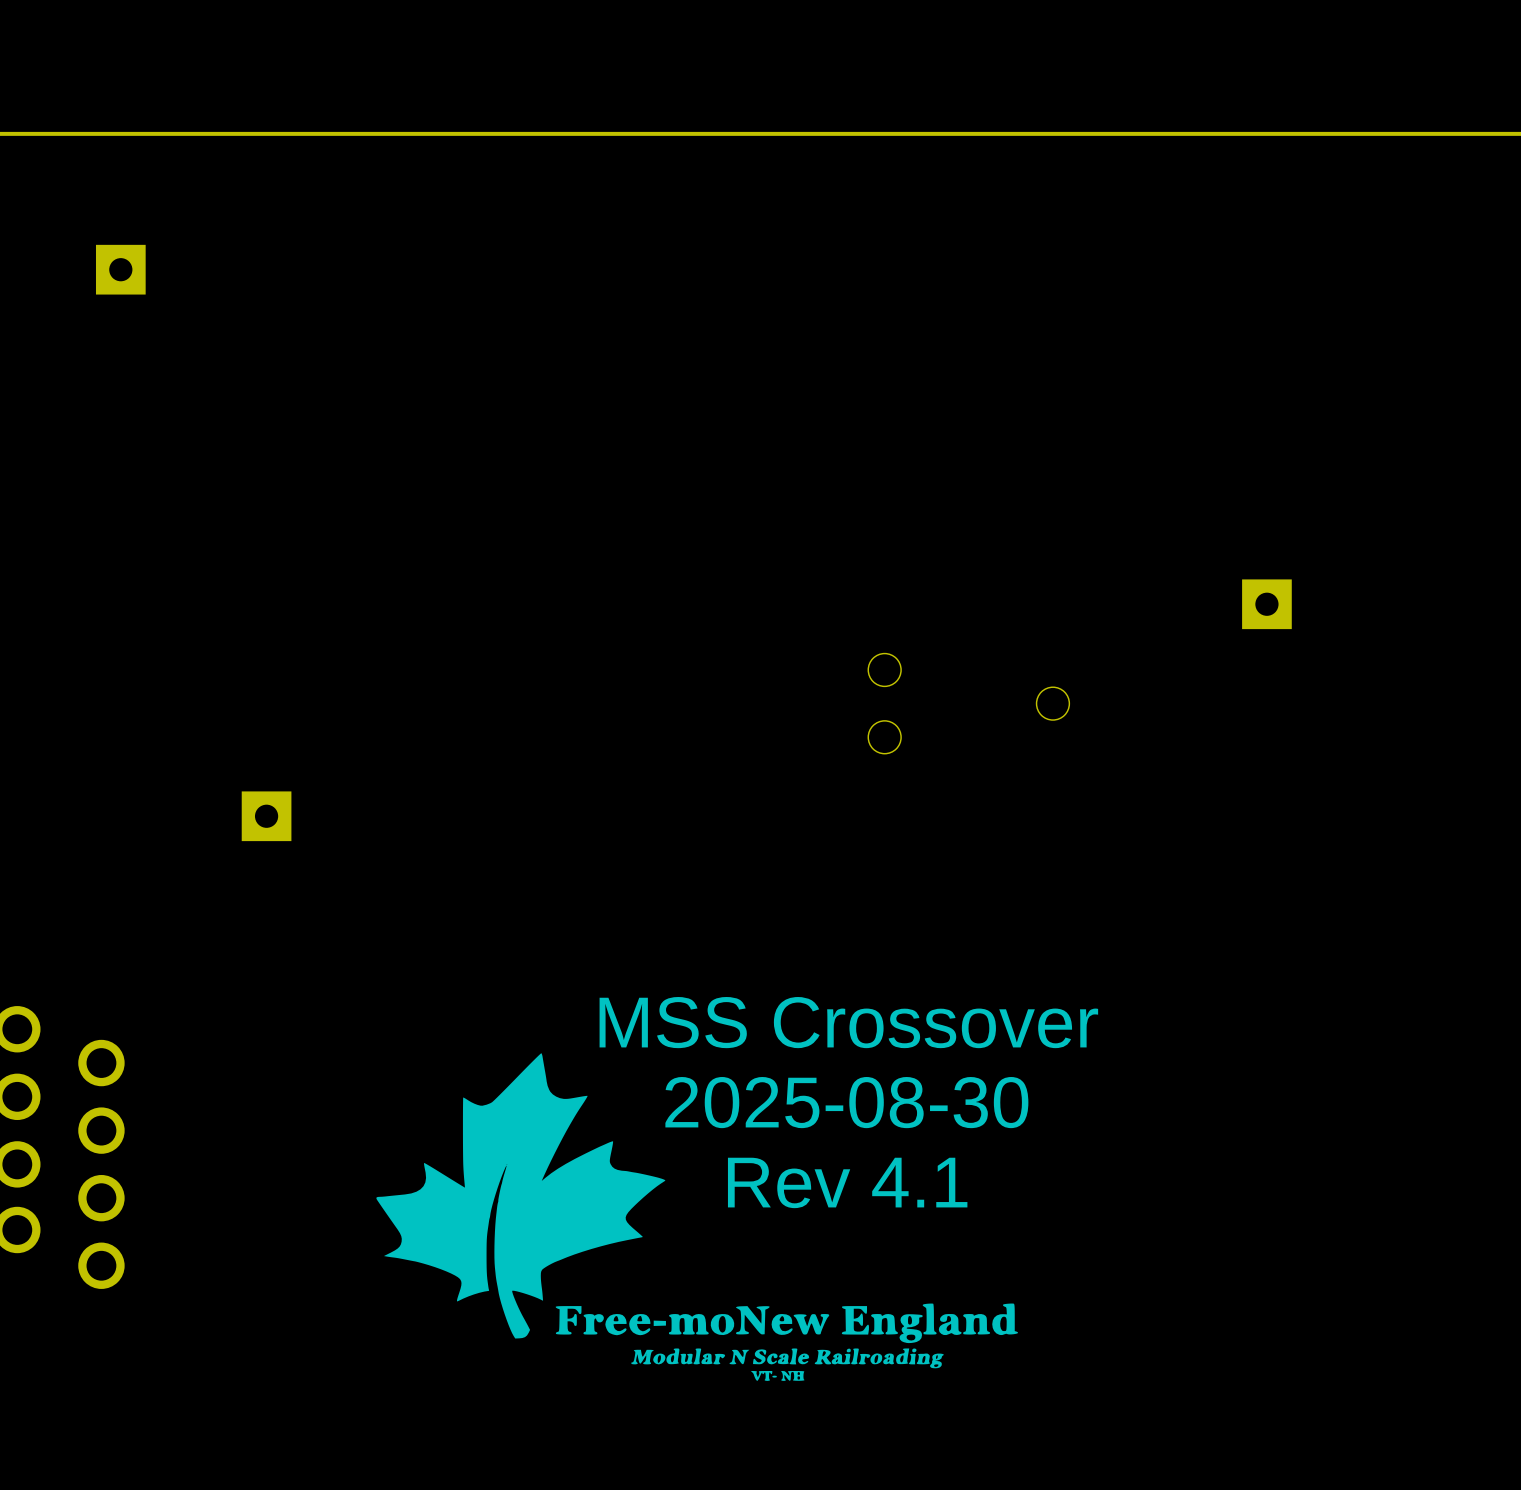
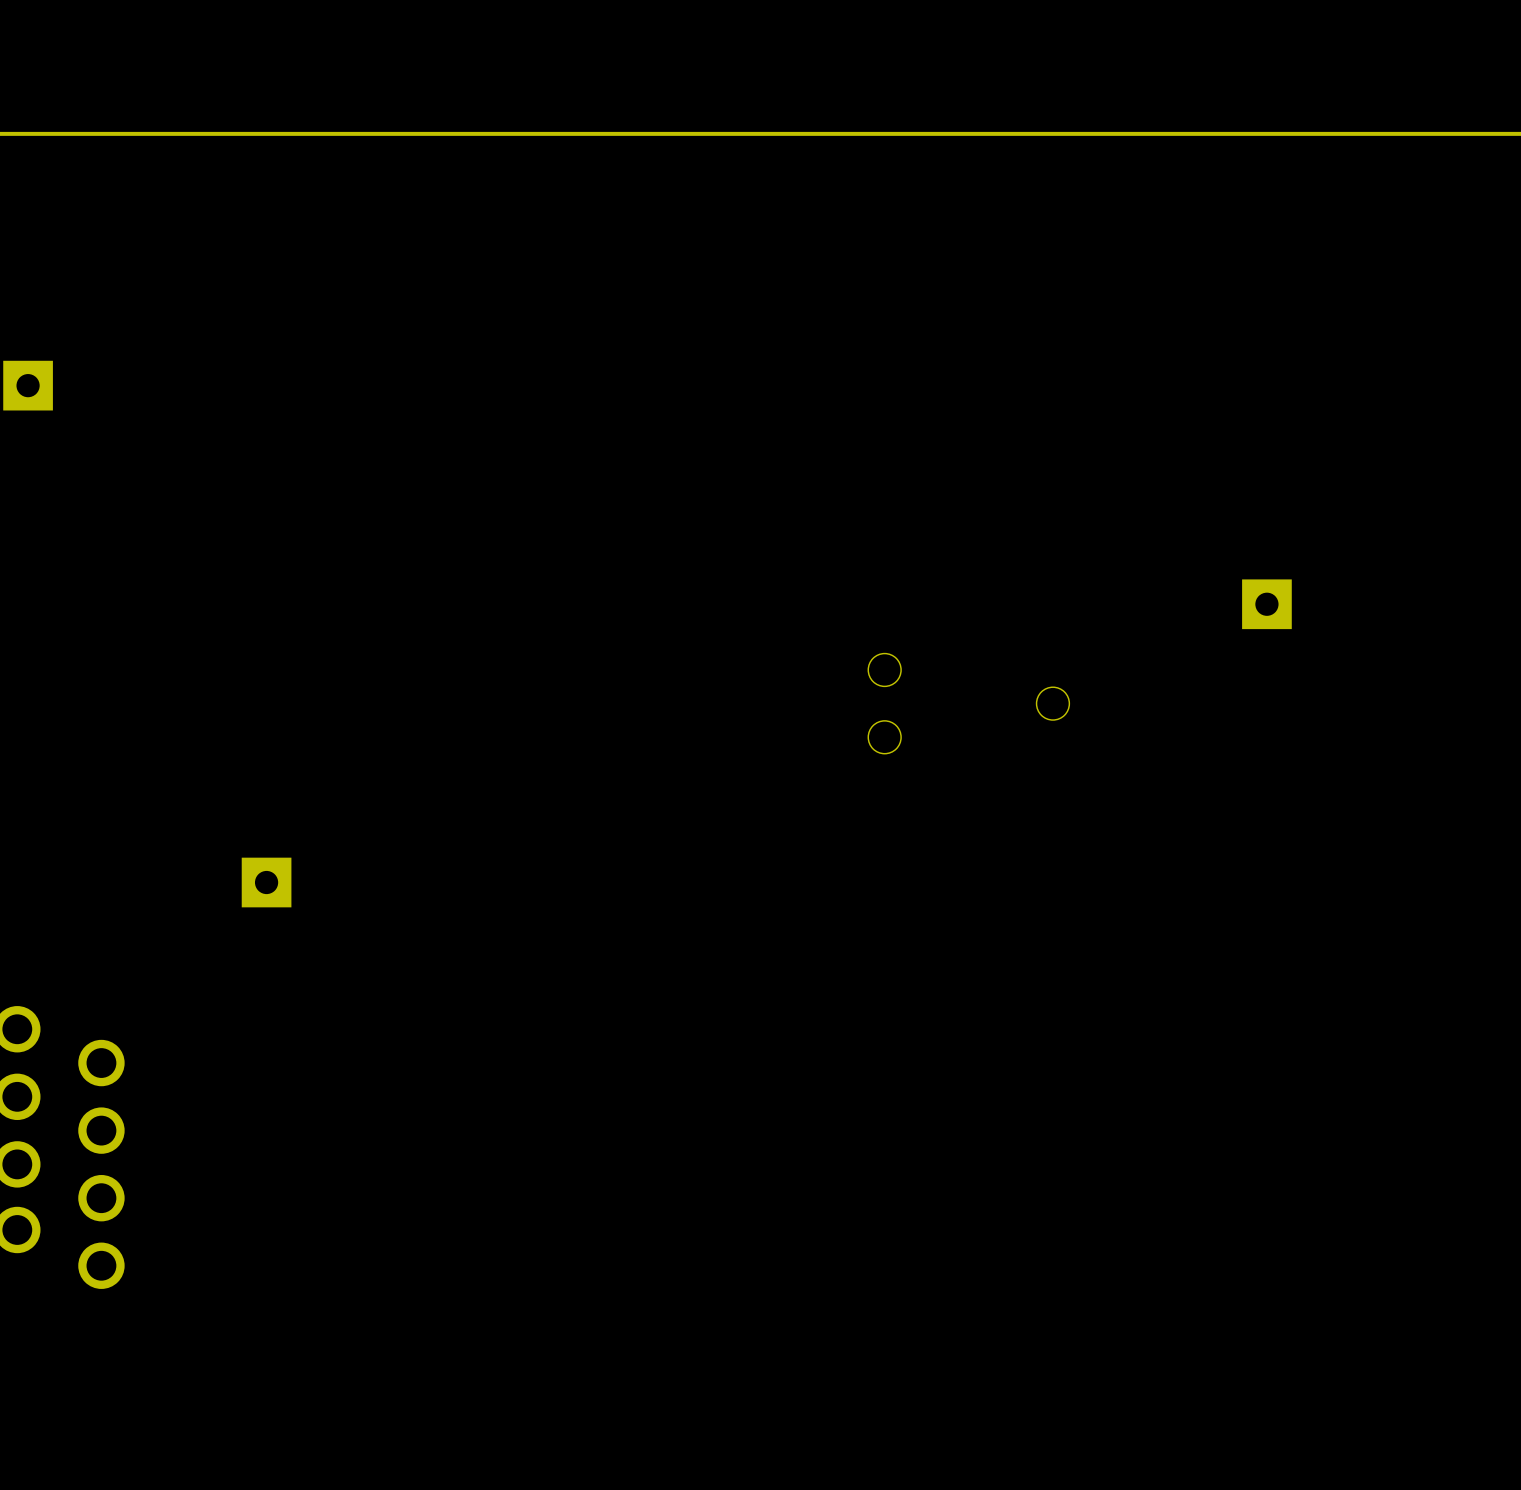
part position: (120, 269) -> (28, 385)
part position: (266, 816) -> (266, 882)
text: MSS Crossover (848, 1022) -> none
drawing: [376, 1053, 1019, 1381] -> none
text: 2025-08-30 (846, 1102) -> none
text: Rev 4.1 (847, 1182) -> none

